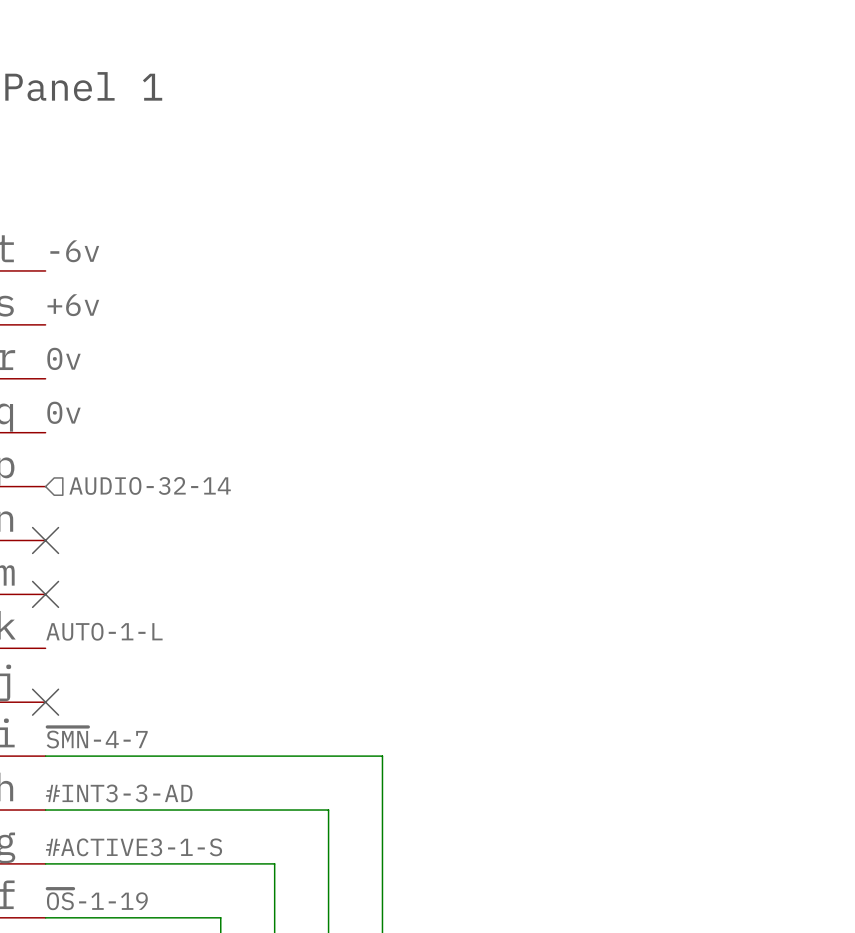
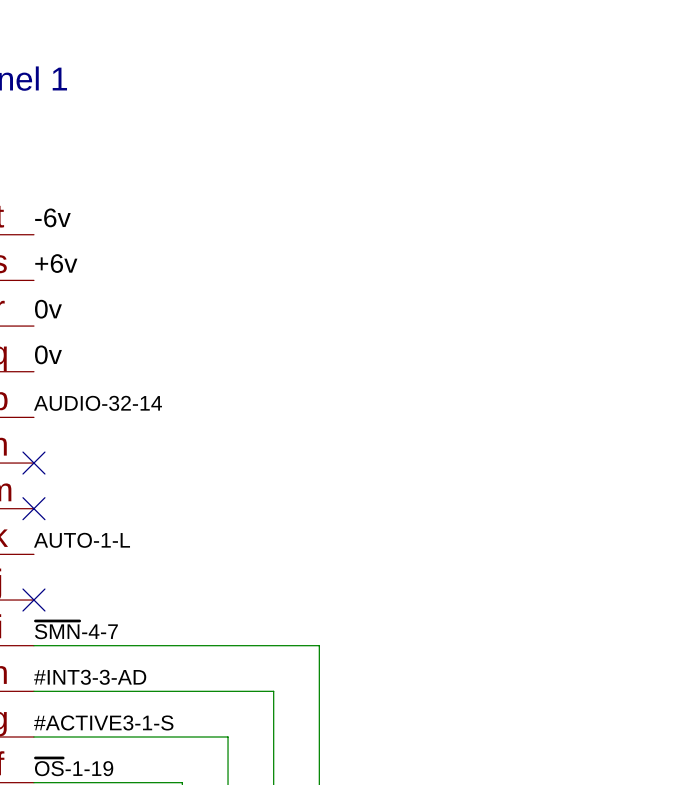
label: none -> AUDIO-32-14 (98, 403)
hierarchical label: AUDIO-32-14 (150, 485) -> none

